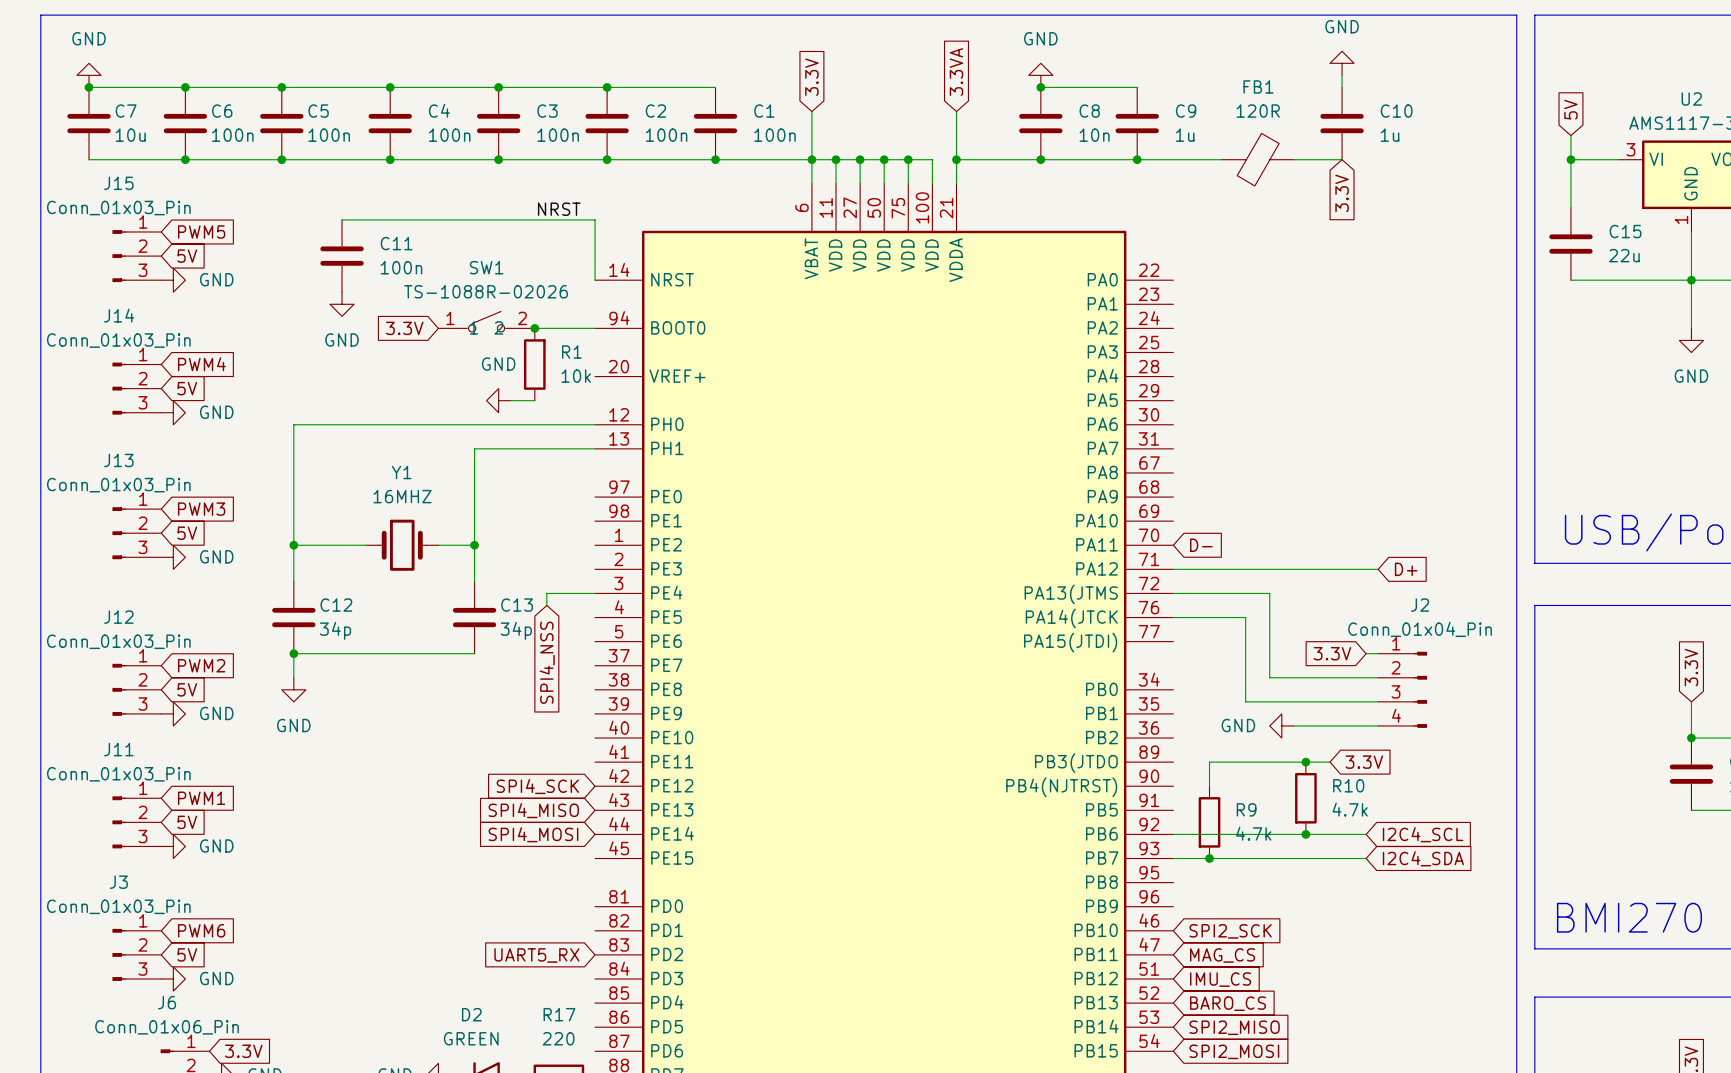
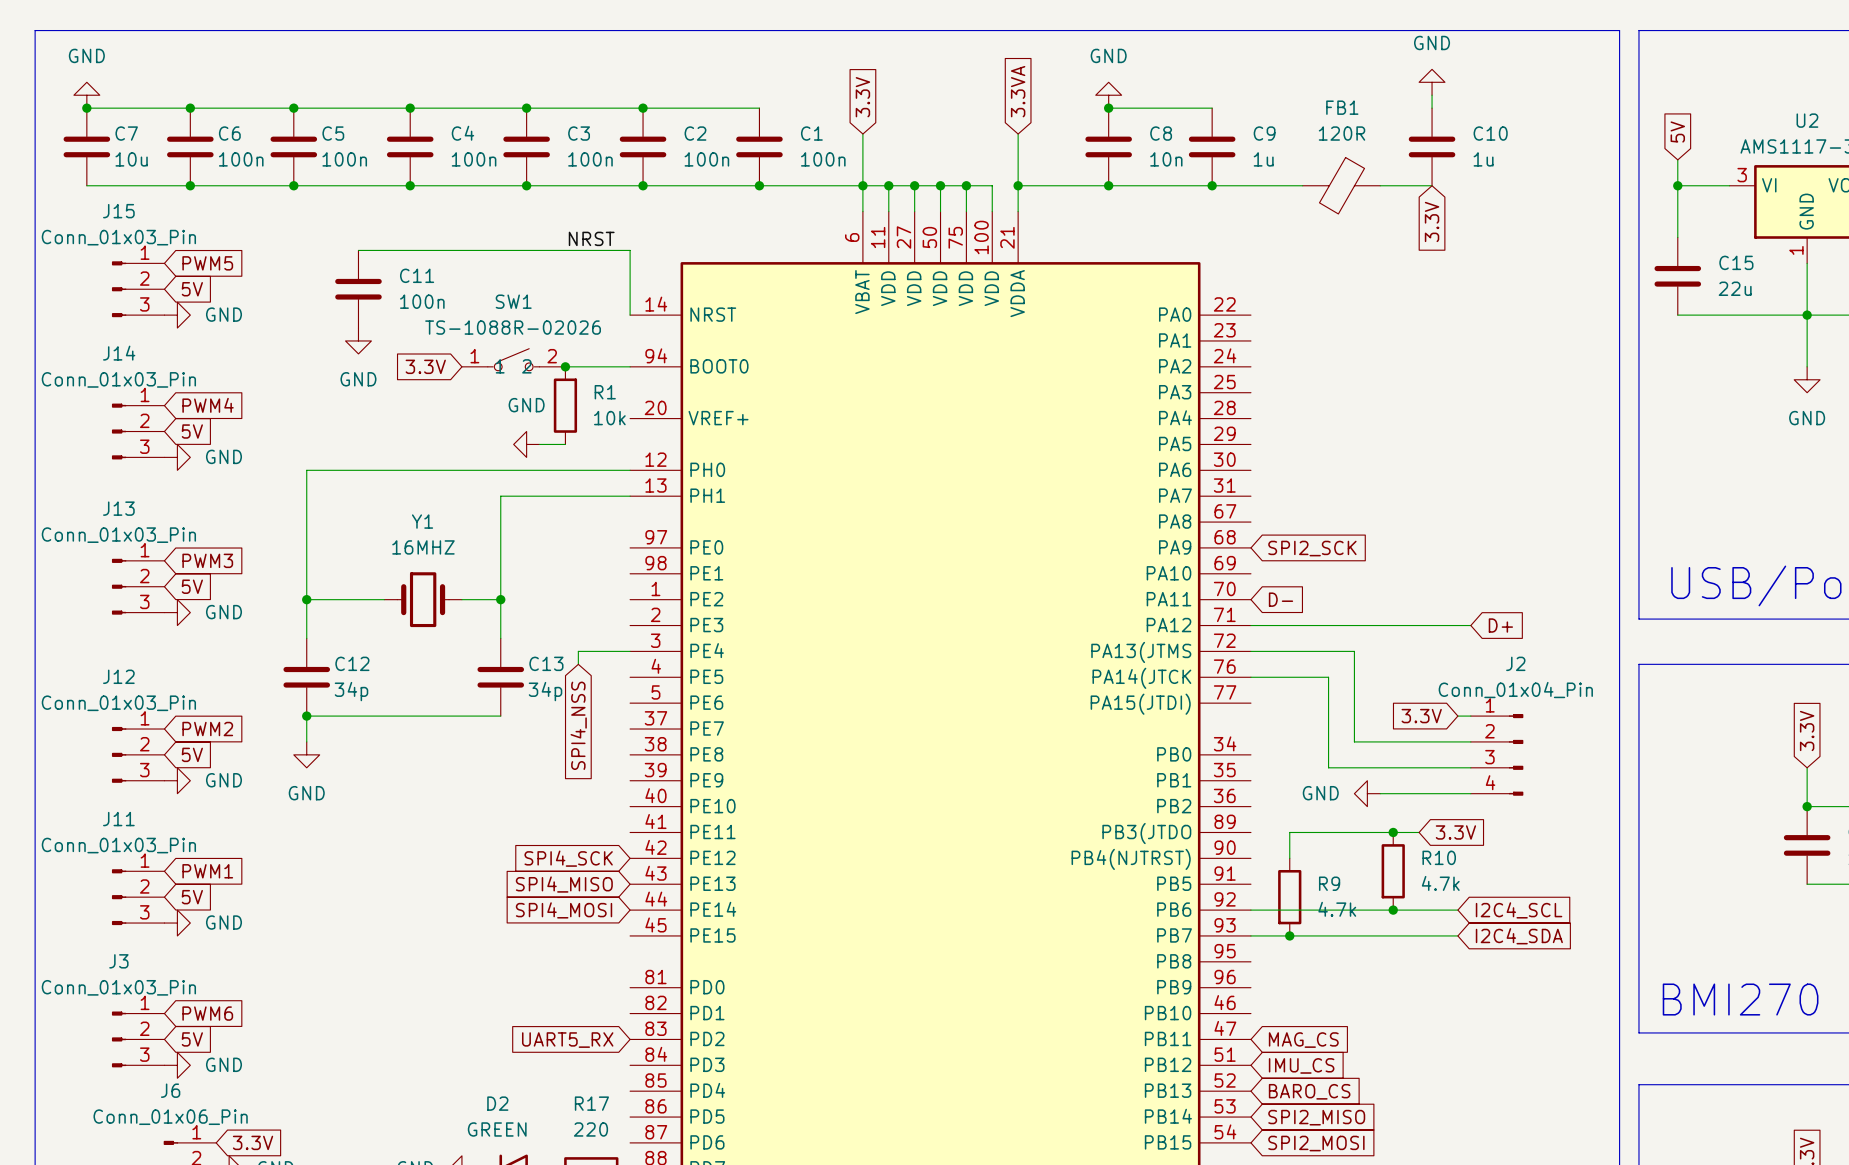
global label: none -> SPI2_SCK (1312, 548)
global label: SPI2_SCK (1230, 931) -> none

